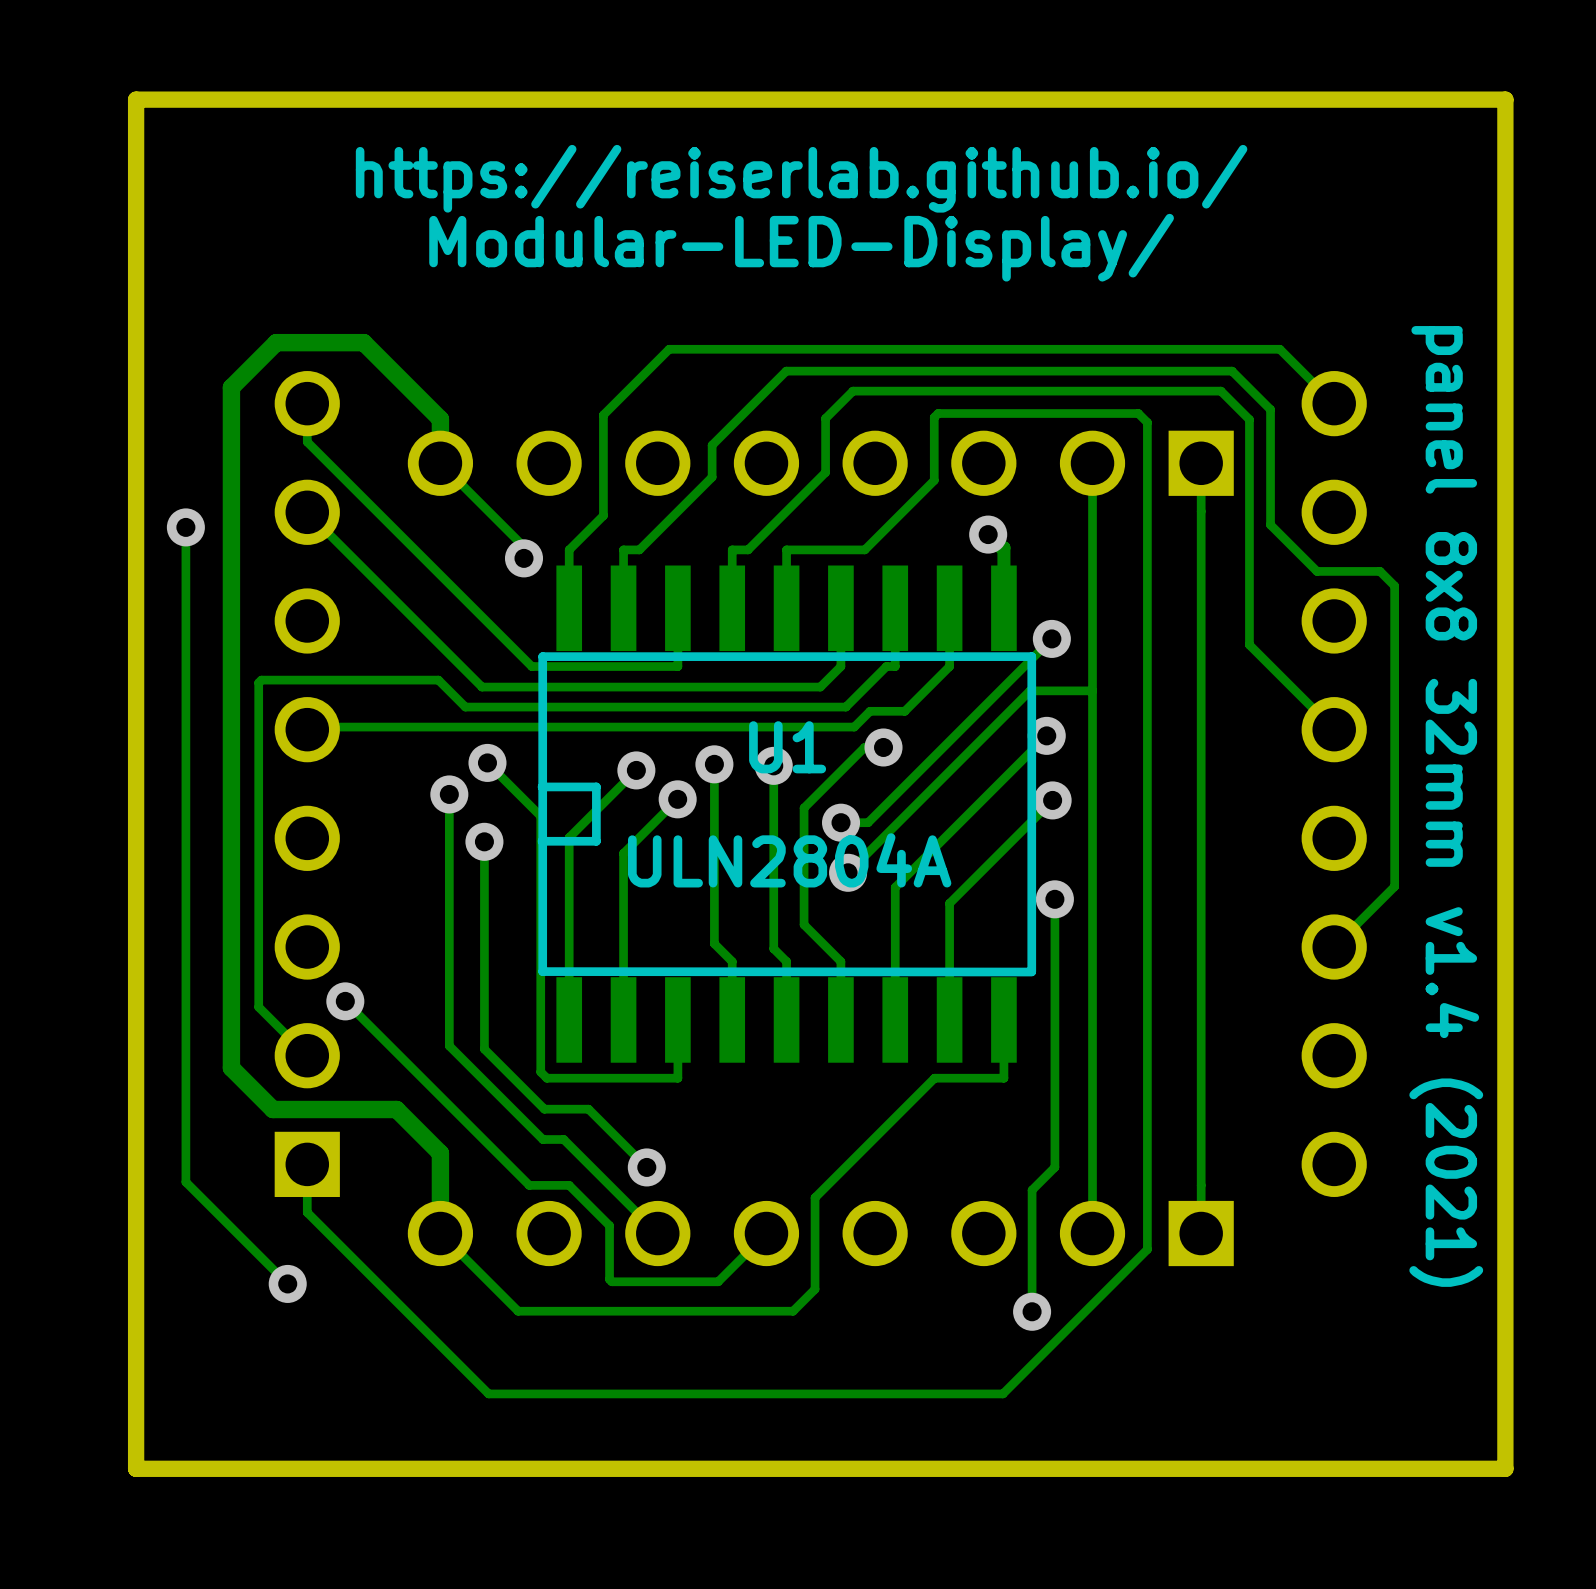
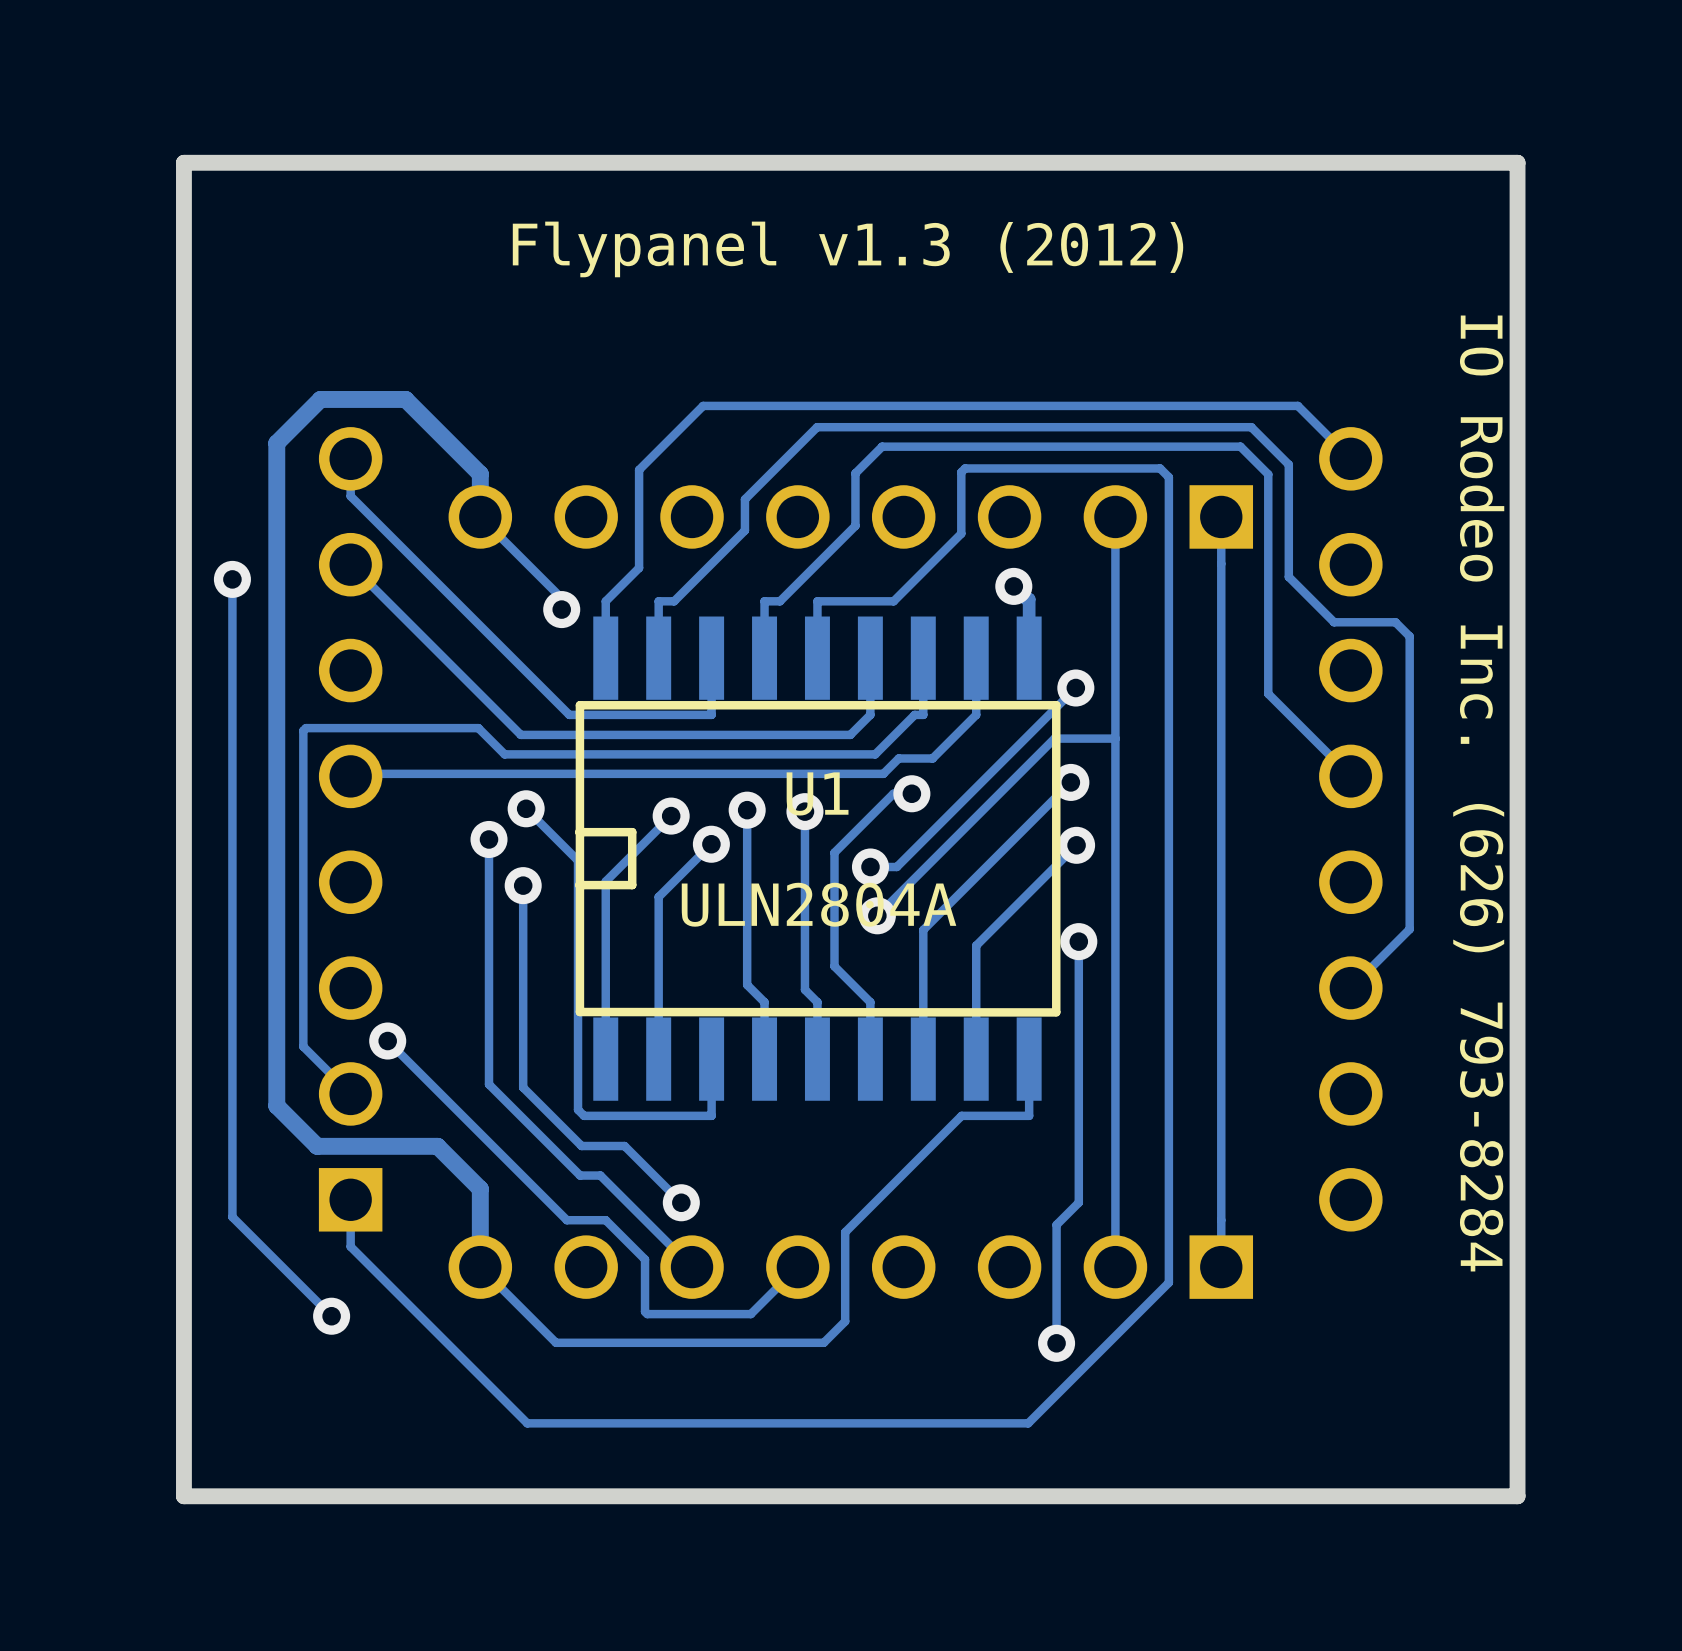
text: https://reiserlab.github.io/ (801, 178) -> Flypanel v1.3 (2012) (848, 249)
text: Modular-LED-Display/ (801, 247) -> none
text: none -> IO Rodeo Inc. (626) 793-8284 (1478, 793)
text: panel 8x8 32mm v1.4 (2021) (1446, 806) -> none

